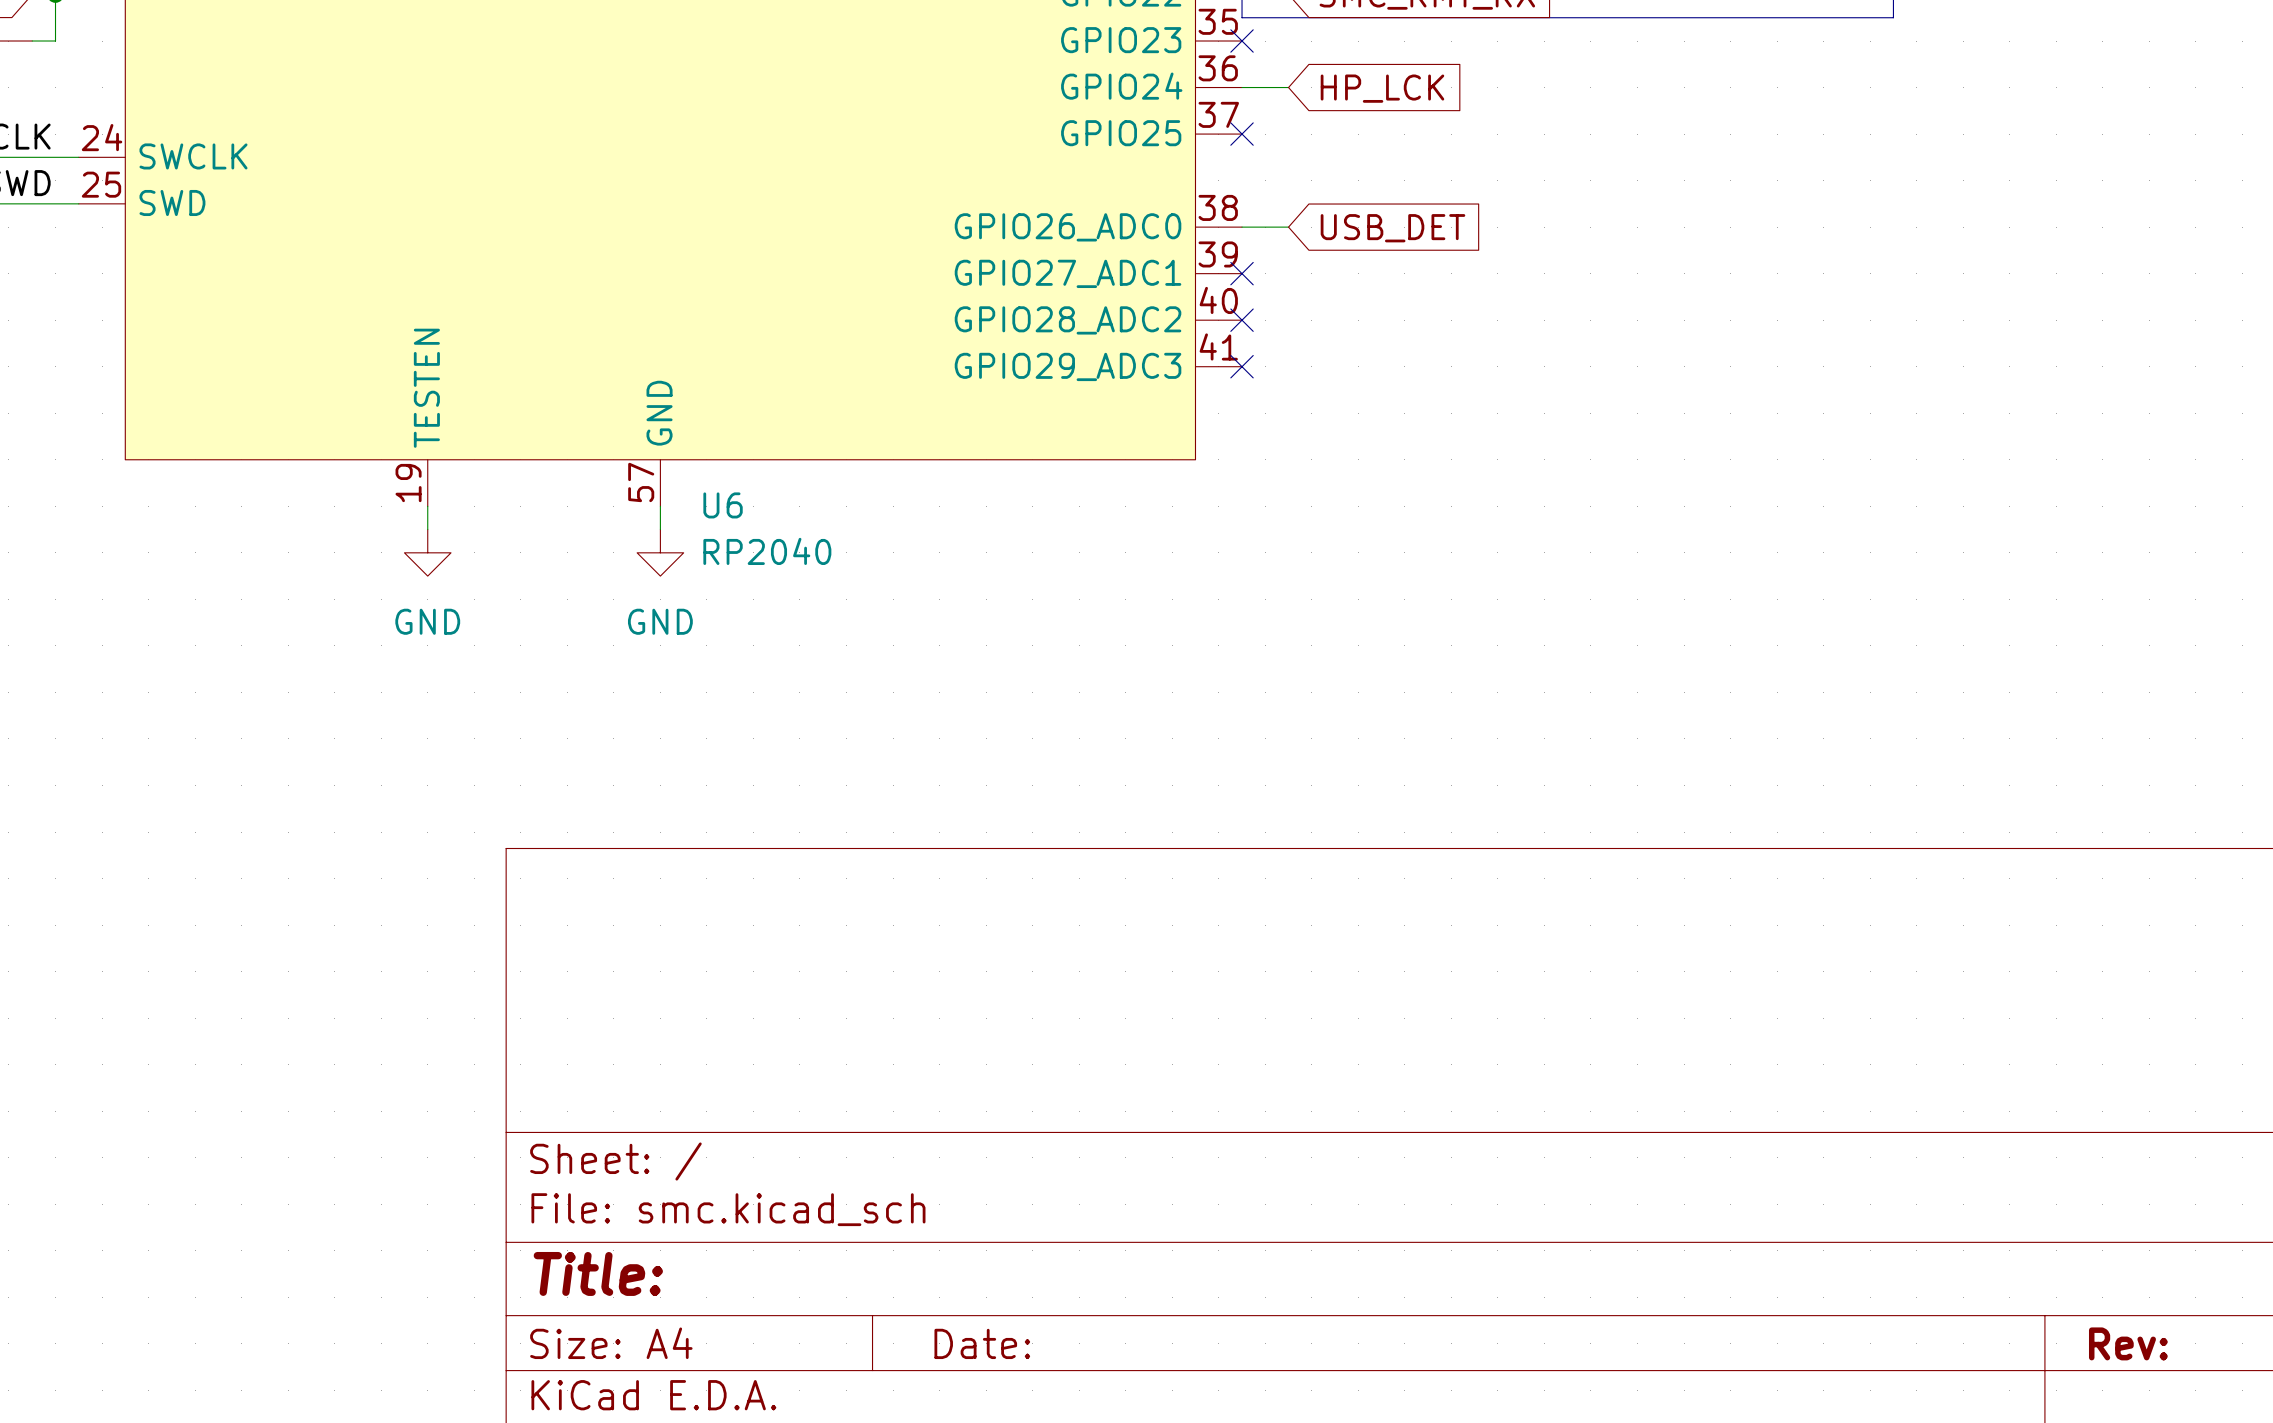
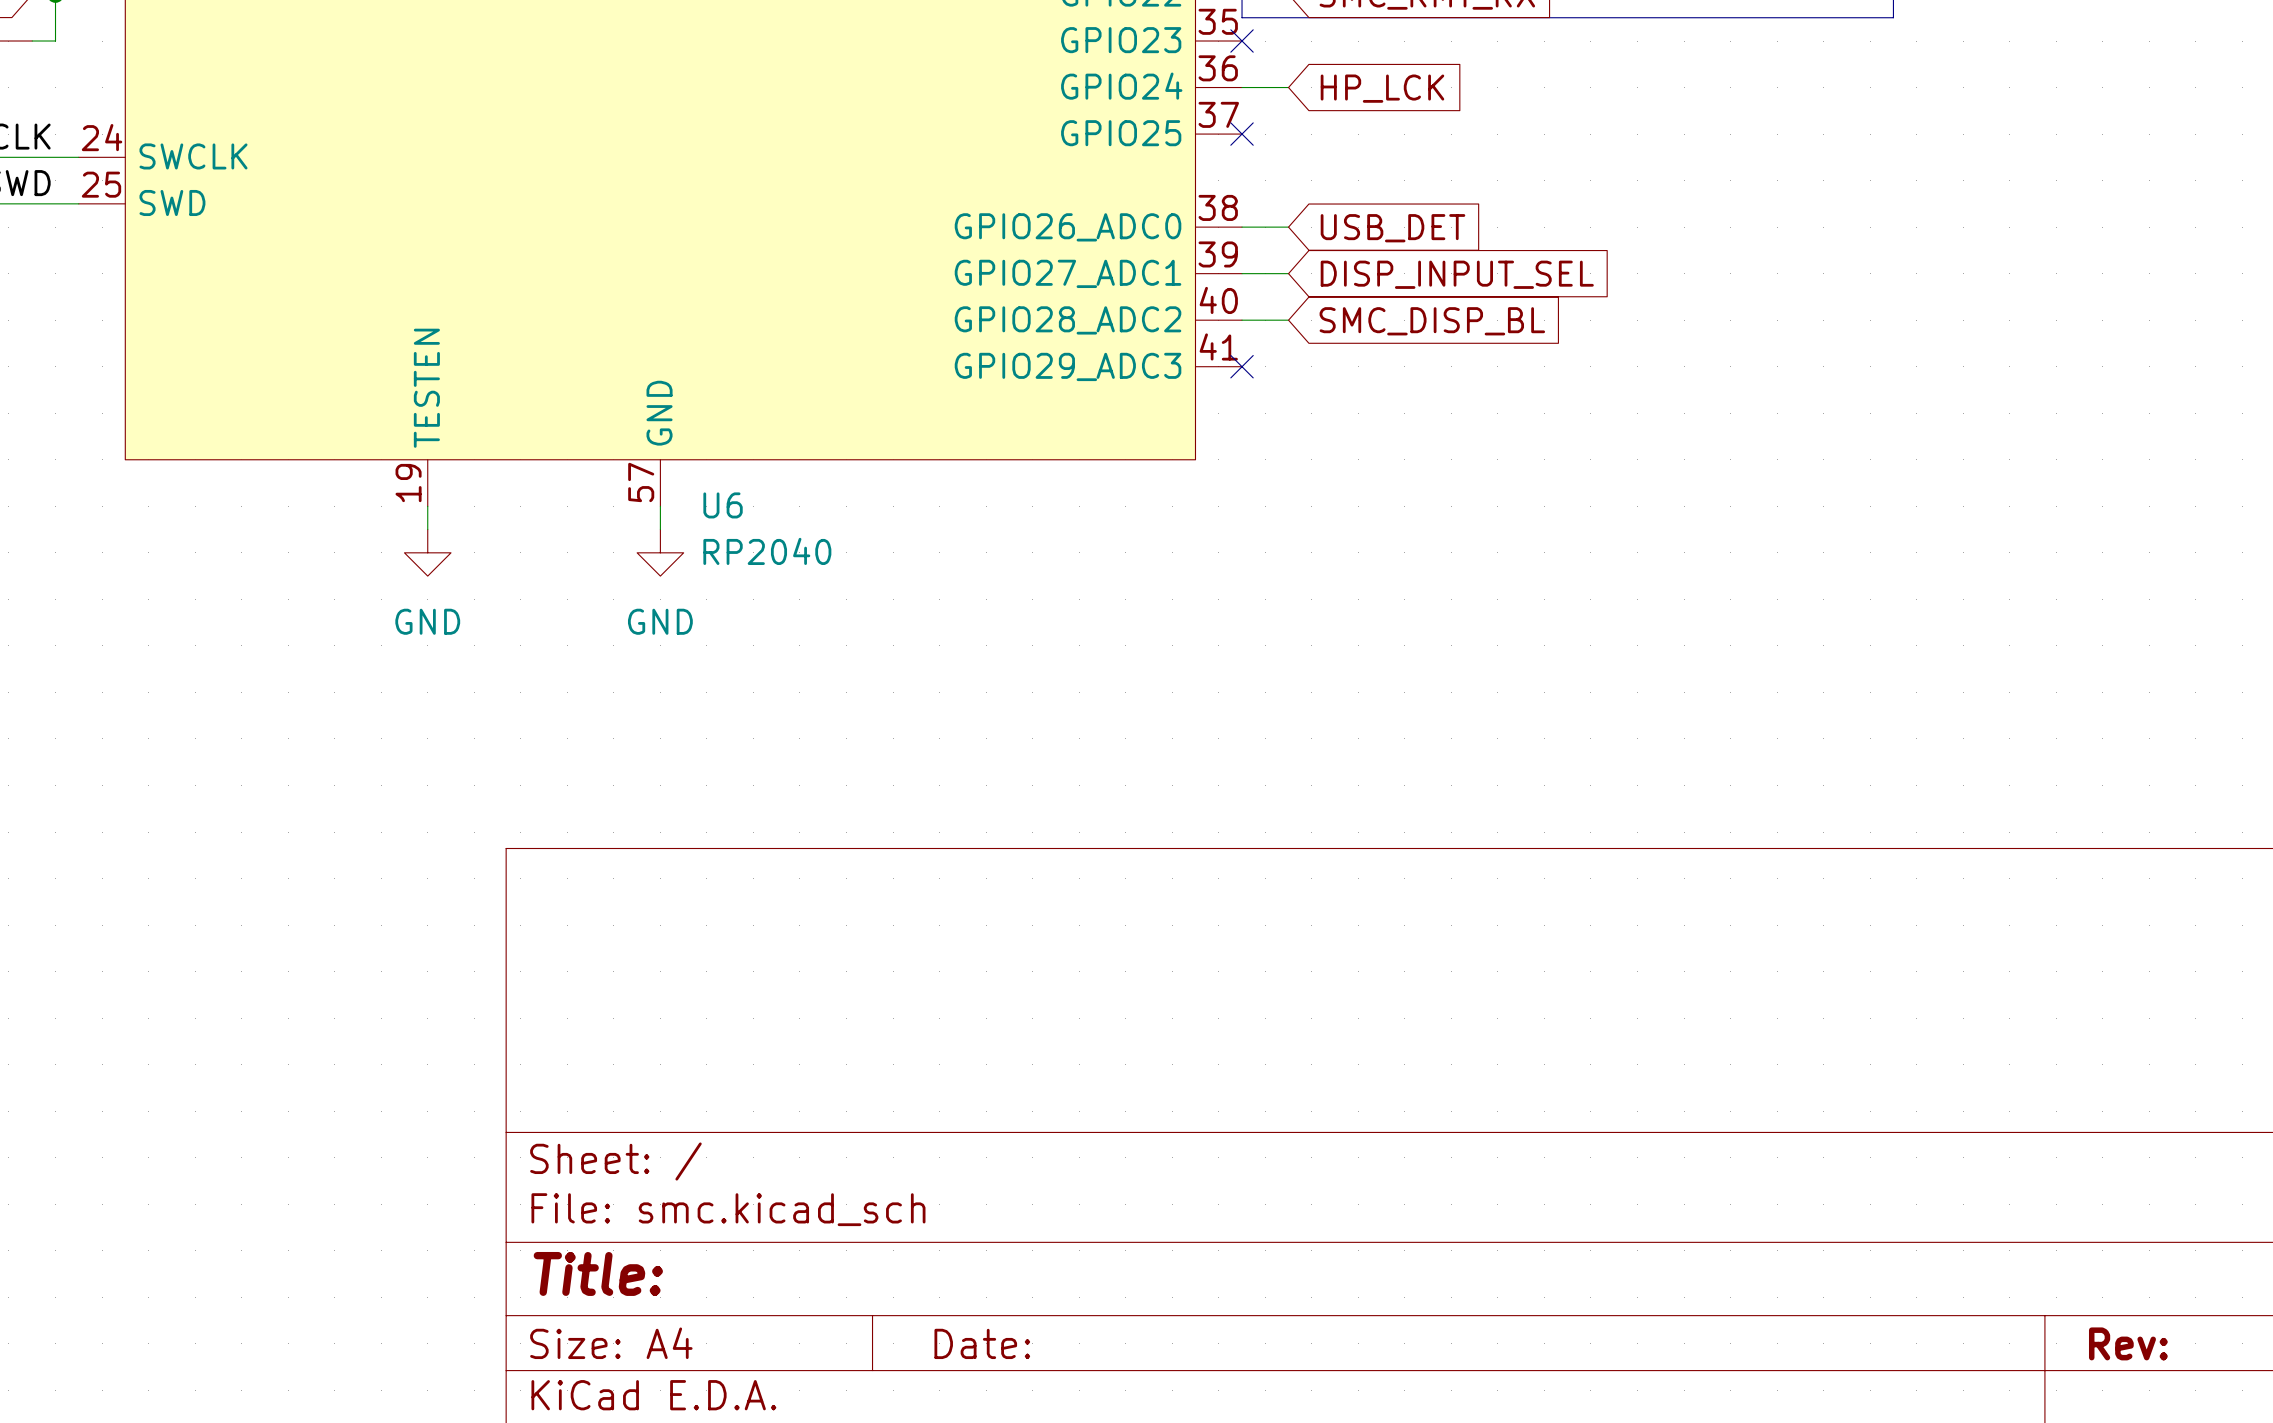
wire: none -> (1242, 273) (1288, 273)
no-connect mark: (1242, 273) -> none
global label: none -> DISP_INPUT_SEL (1457, 274)
wire: none -> (1242, 320) (1288, 320)
no-connect mark: (1242, 320) -> none
global label: none -> SMC_DISP_BL (1432, 321)

